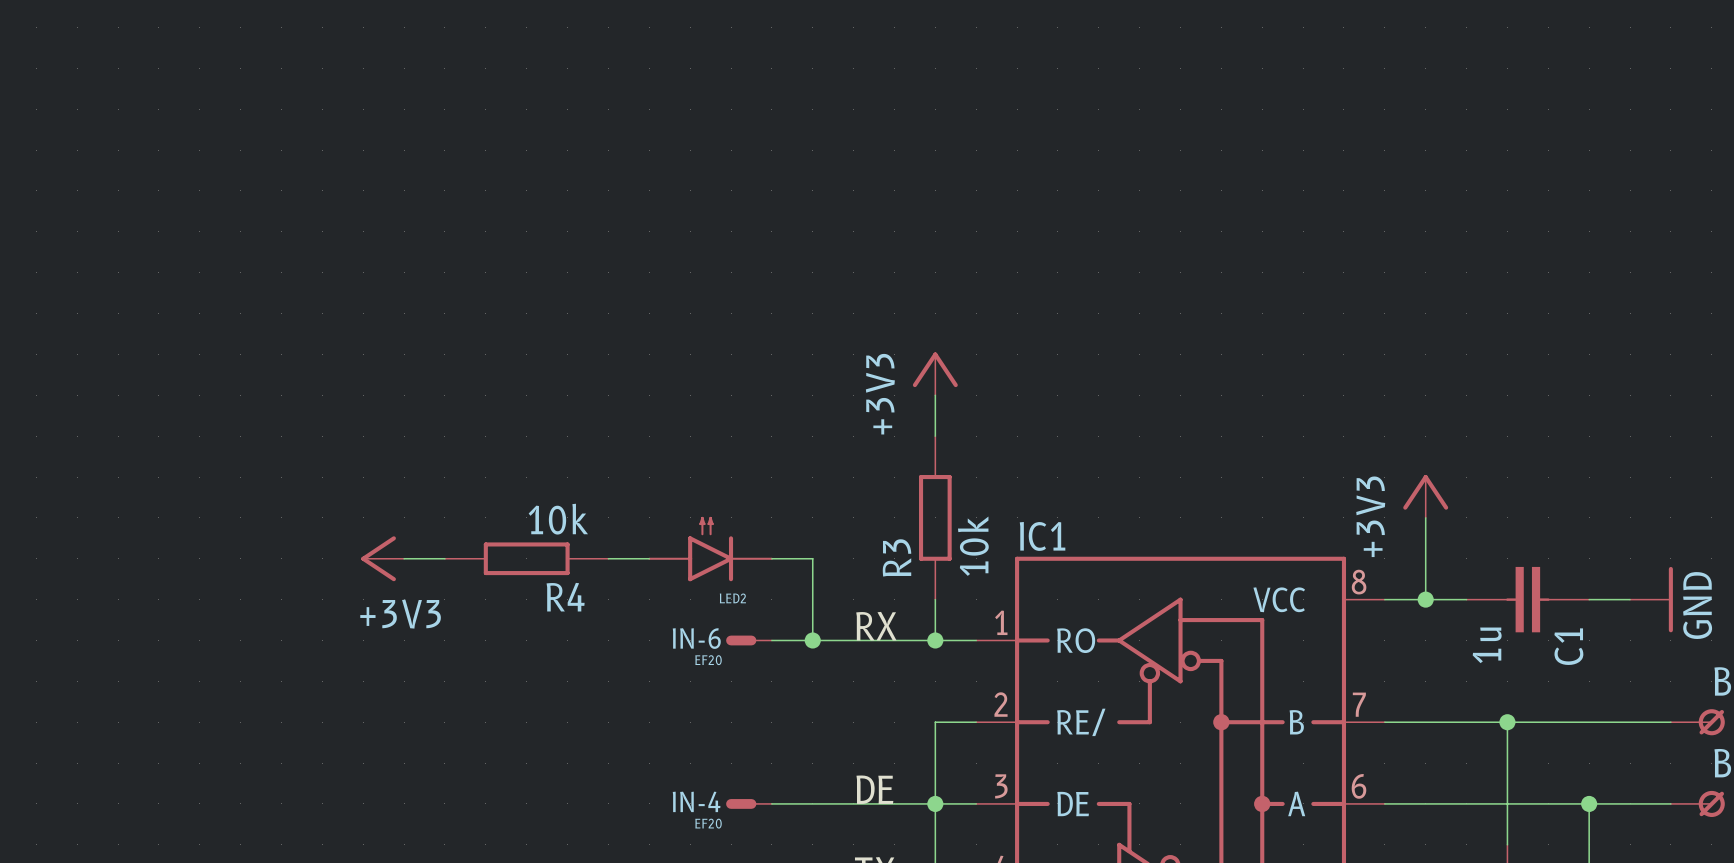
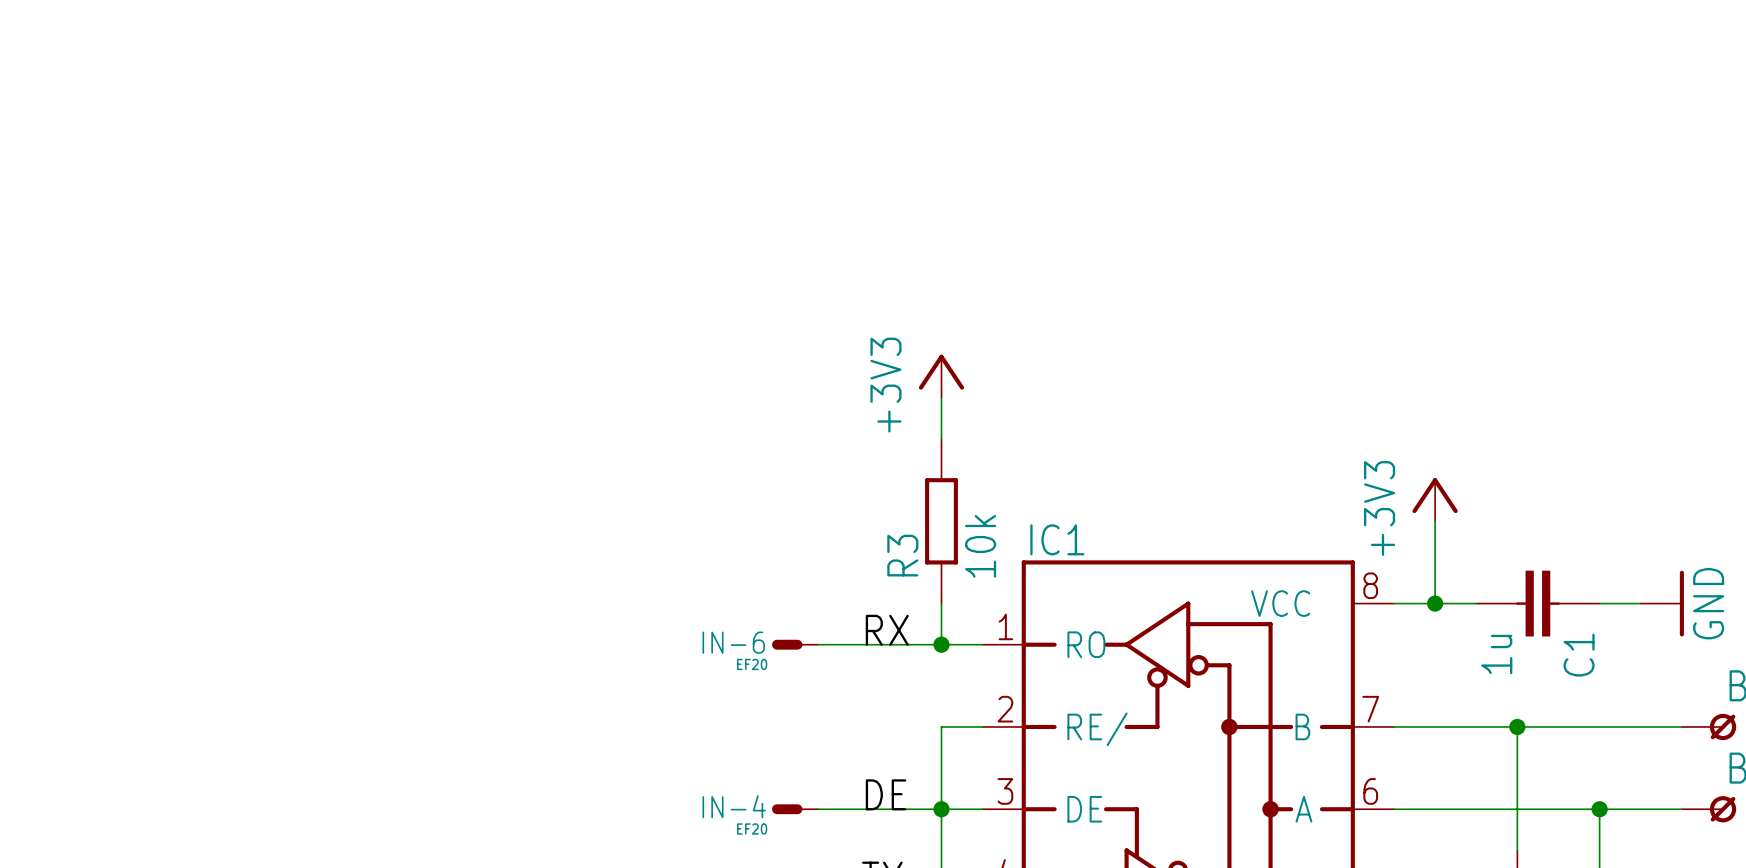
LED2: (710, 549) -> none
power symbol: +3V3 (382, 558) -> none
wire: (404, 558) (444, 558) -> none
R4: 10k (526, 558) -> none
wire: (608, 558) (649, 558) -> none
wire: (771, 558) (812, 558) (812, 640) (771, 640) -> none
IN-6 position: (749, 640) -> (795, 644)
junction: (812, 640) -> none
IN-4 position: (749, 803) -> (795, 809)

